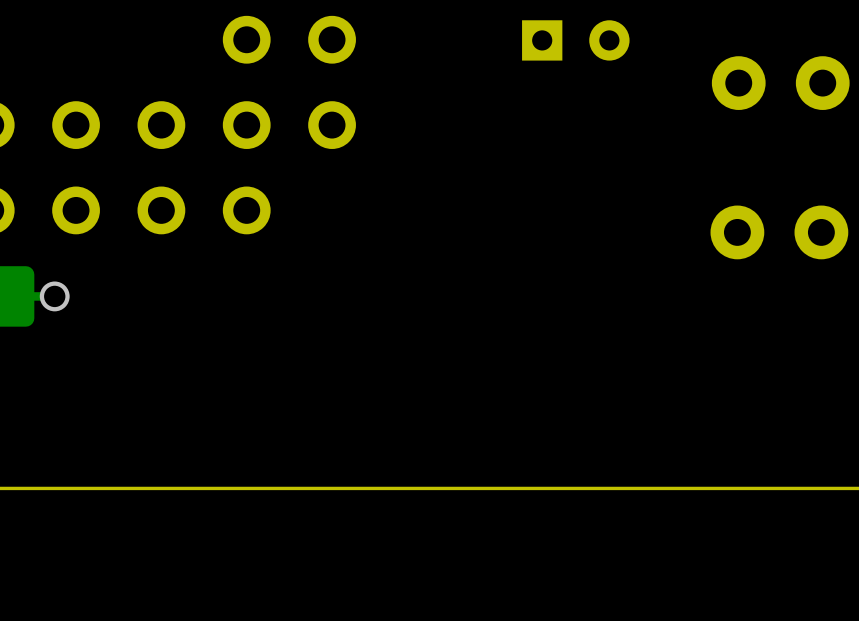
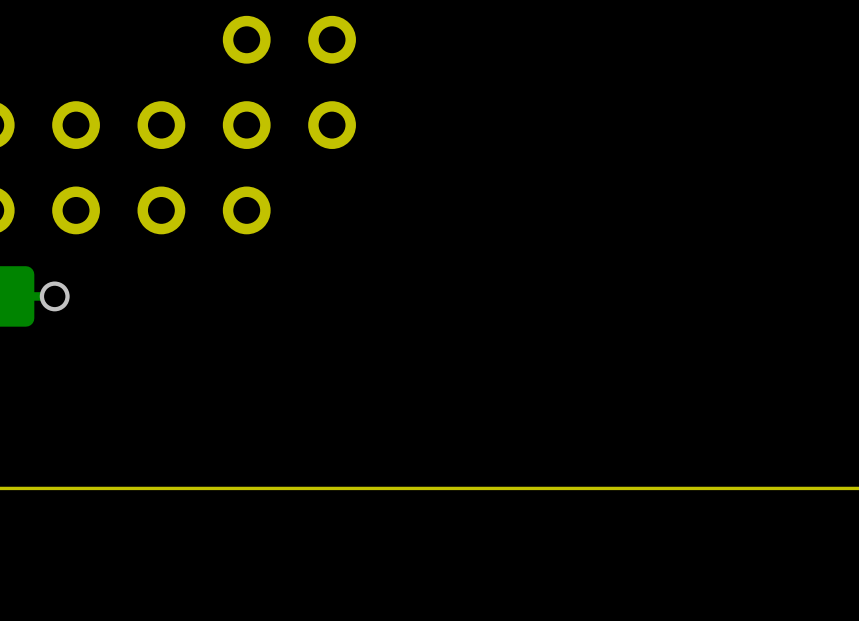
part: (575, 40) -> none
part: (780, 83) -> none
part: (779, 232) -> none

